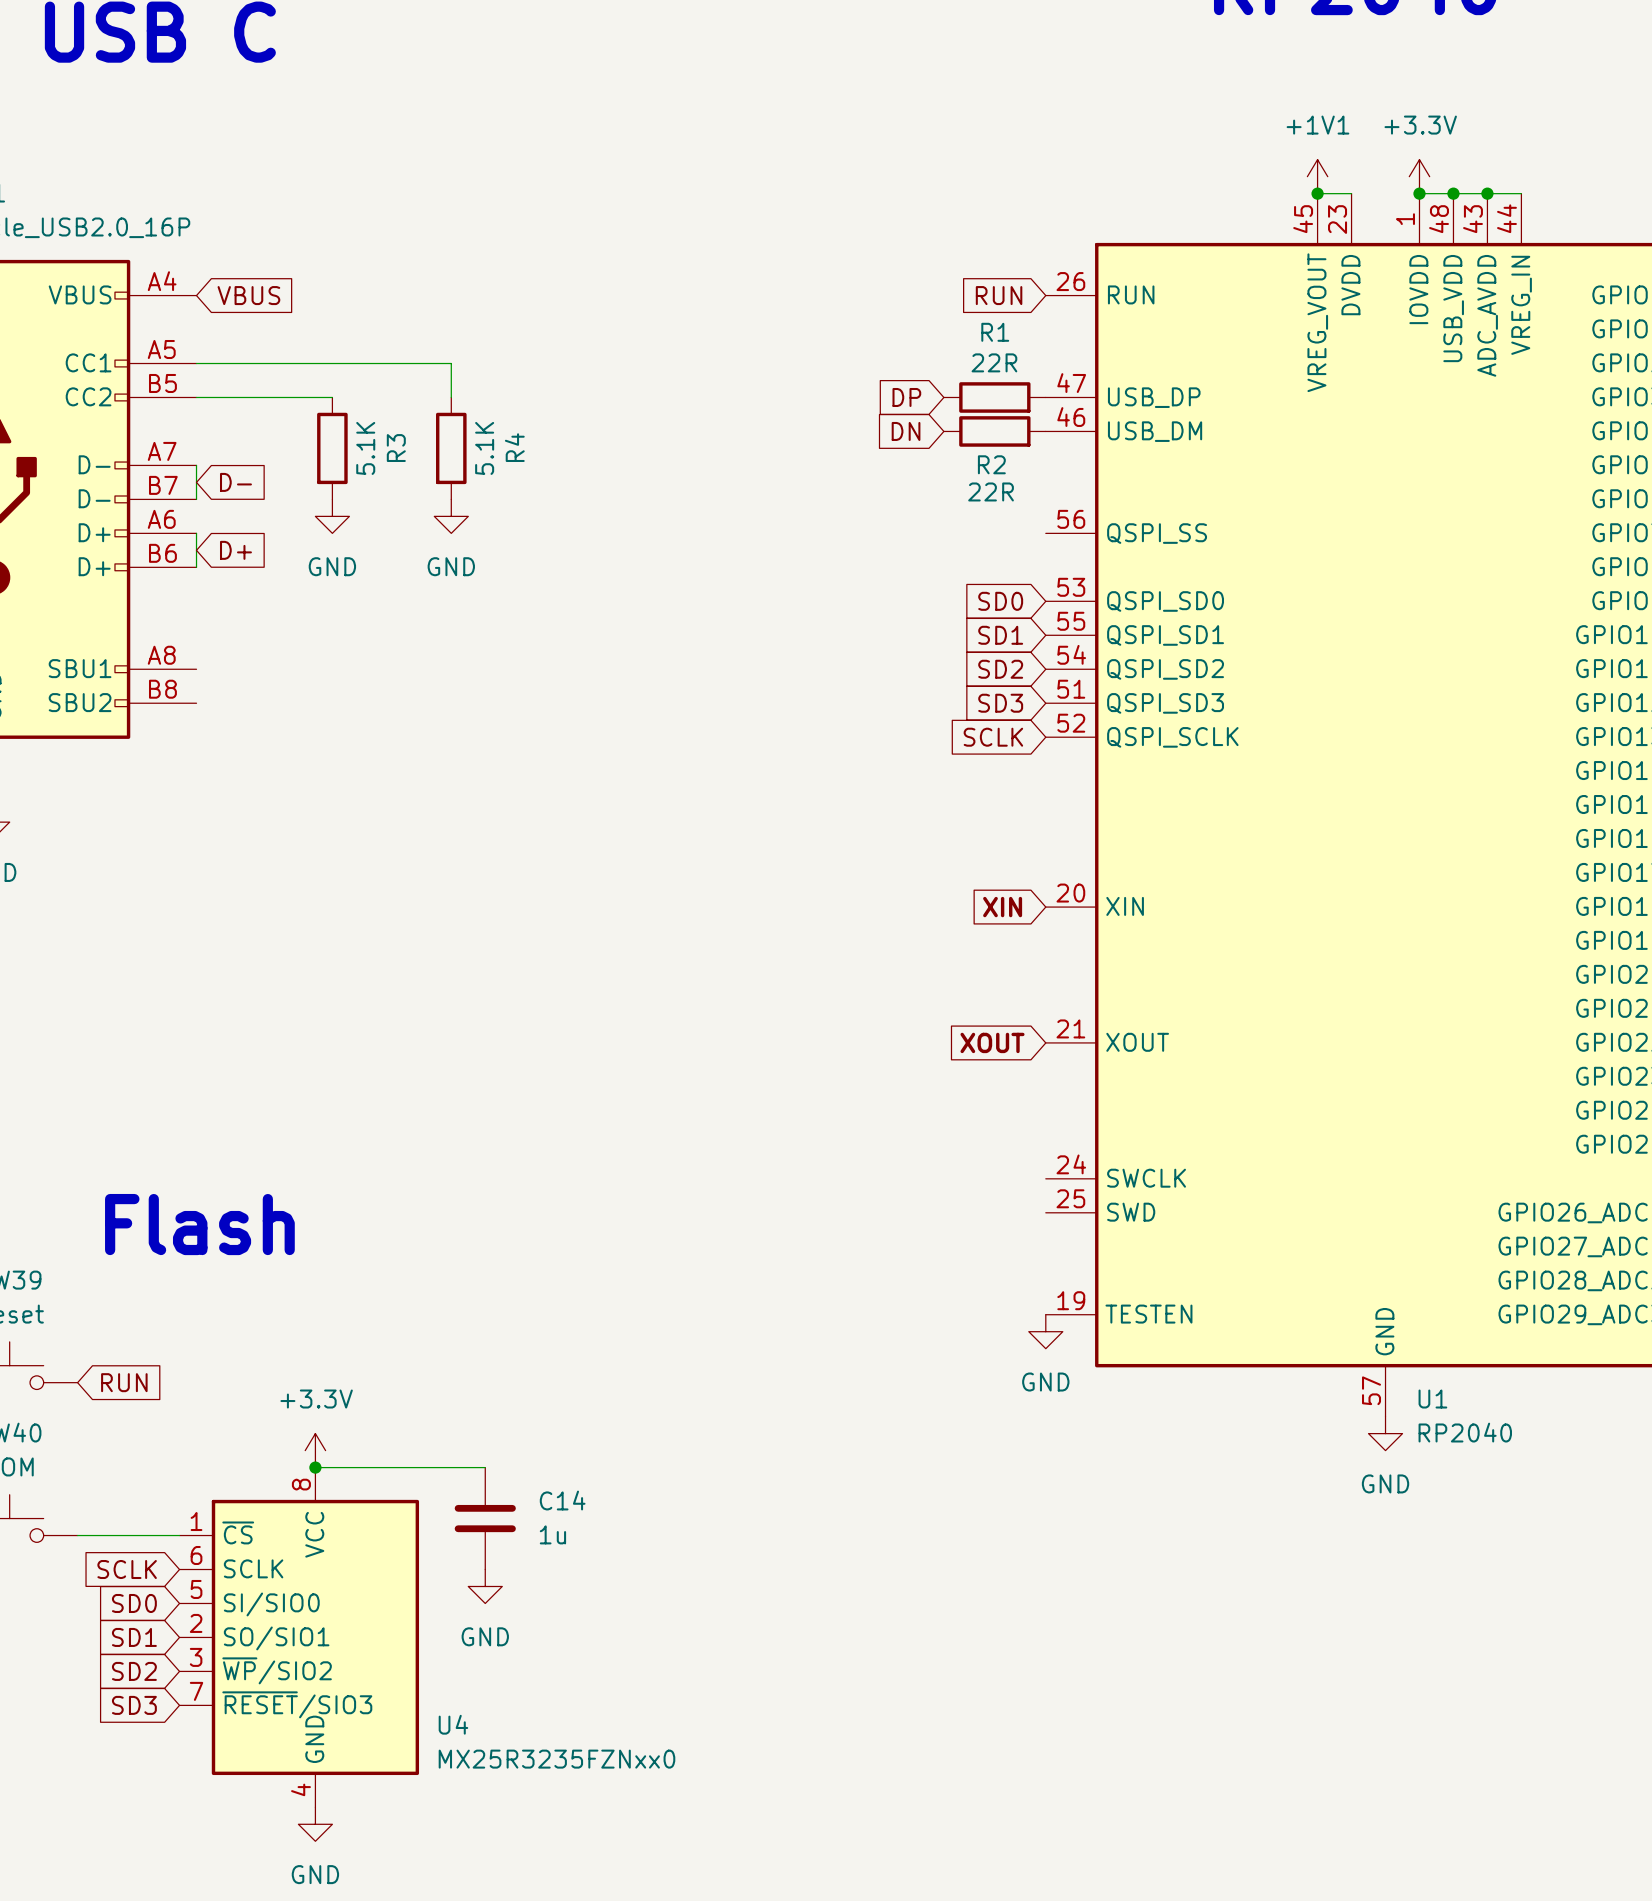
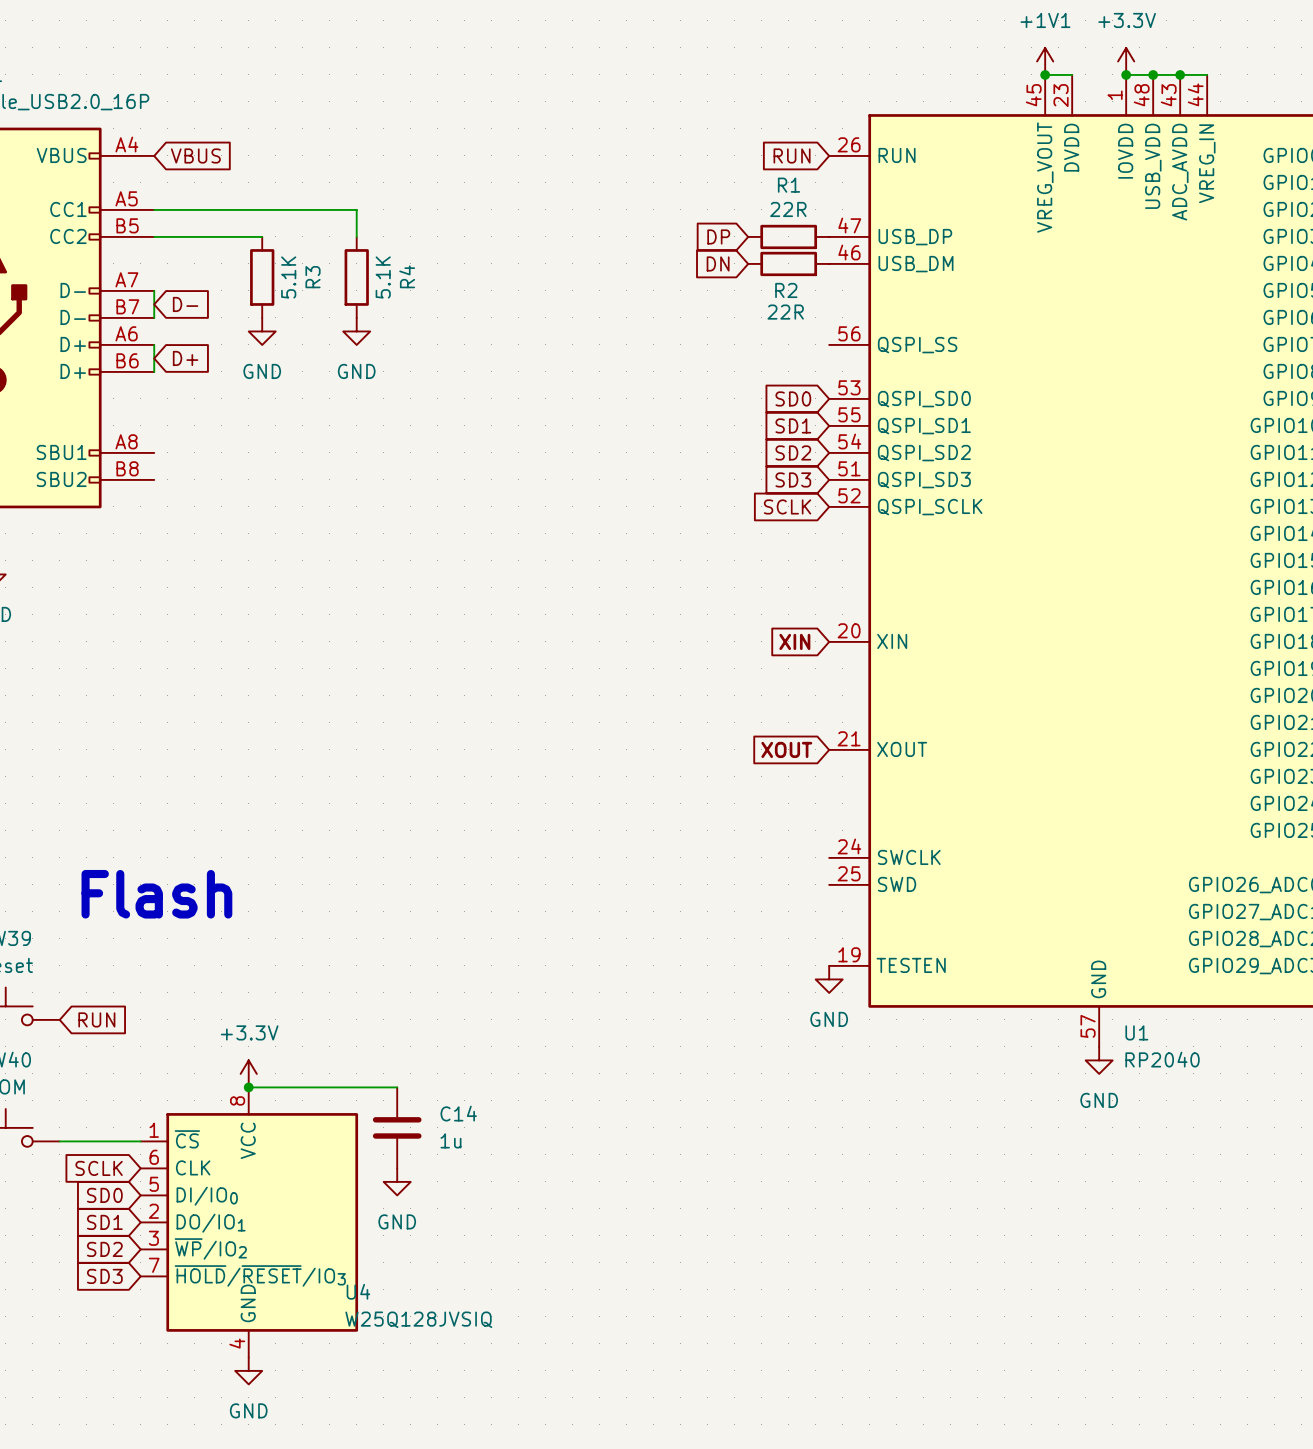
U4 symbol: [179, 1467, 420, 1808] -> [140, 1087, 359, 1358]
wire: none -> (383, 1087) (397, 1087)
C14 position: (485, 1518) -> (397, 1127)
power symbol position: GND (485, 1586) -> GND (397, 1181)
U4 value: MX25R3235FZNxx0 (556, 1759) -> W25Q128JVSIQ (418, 1319)

